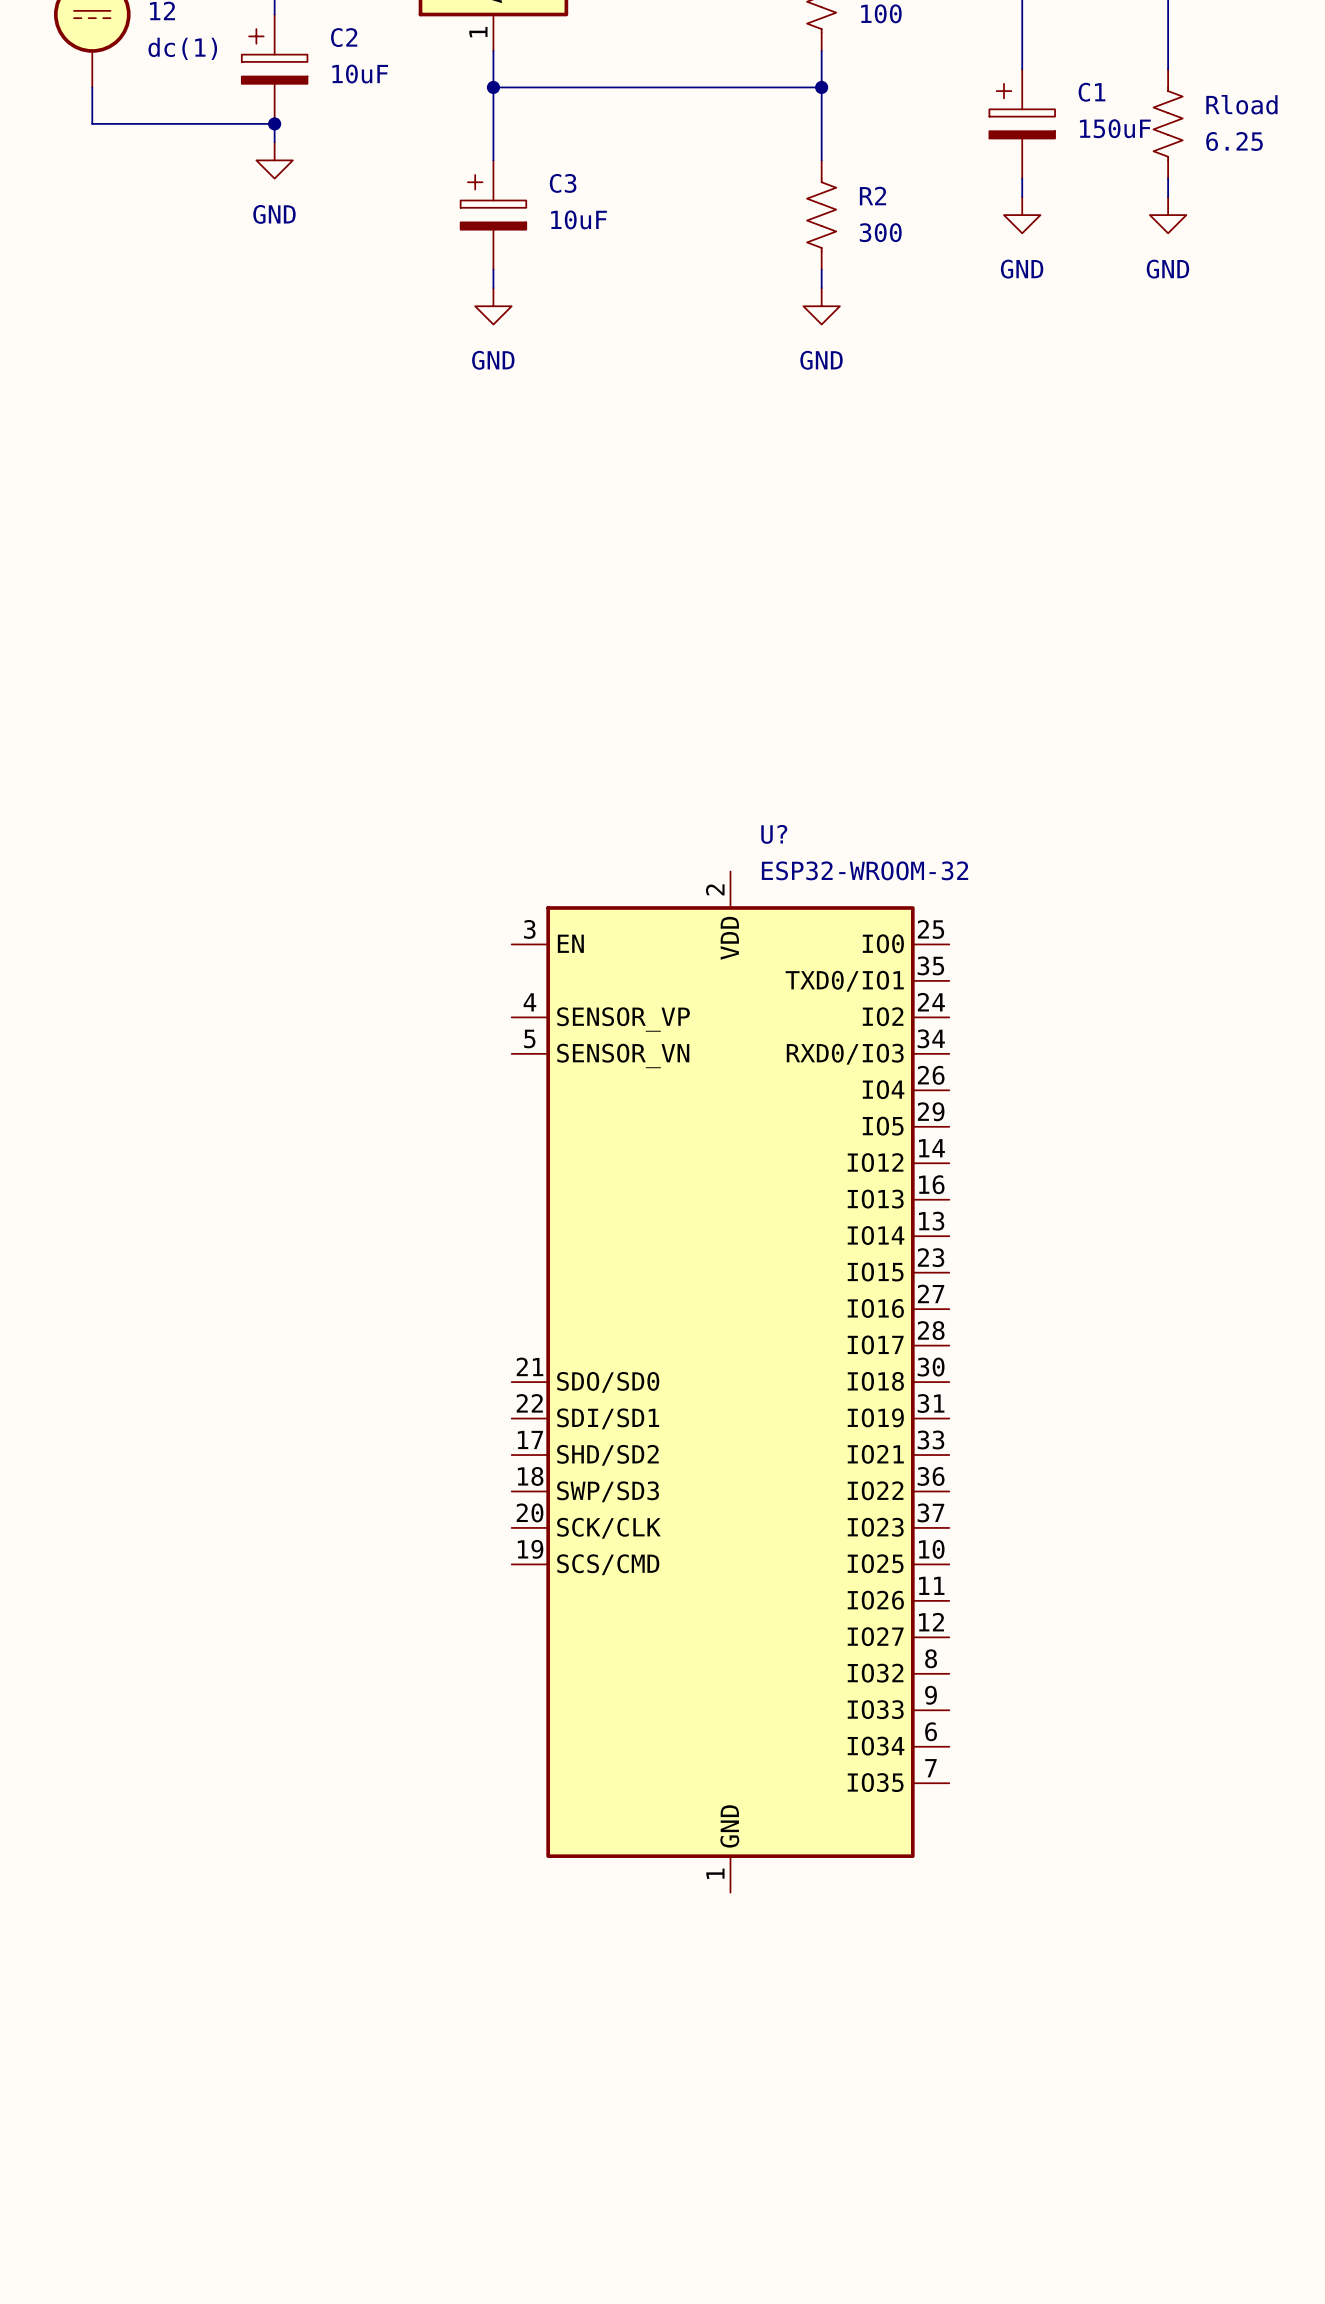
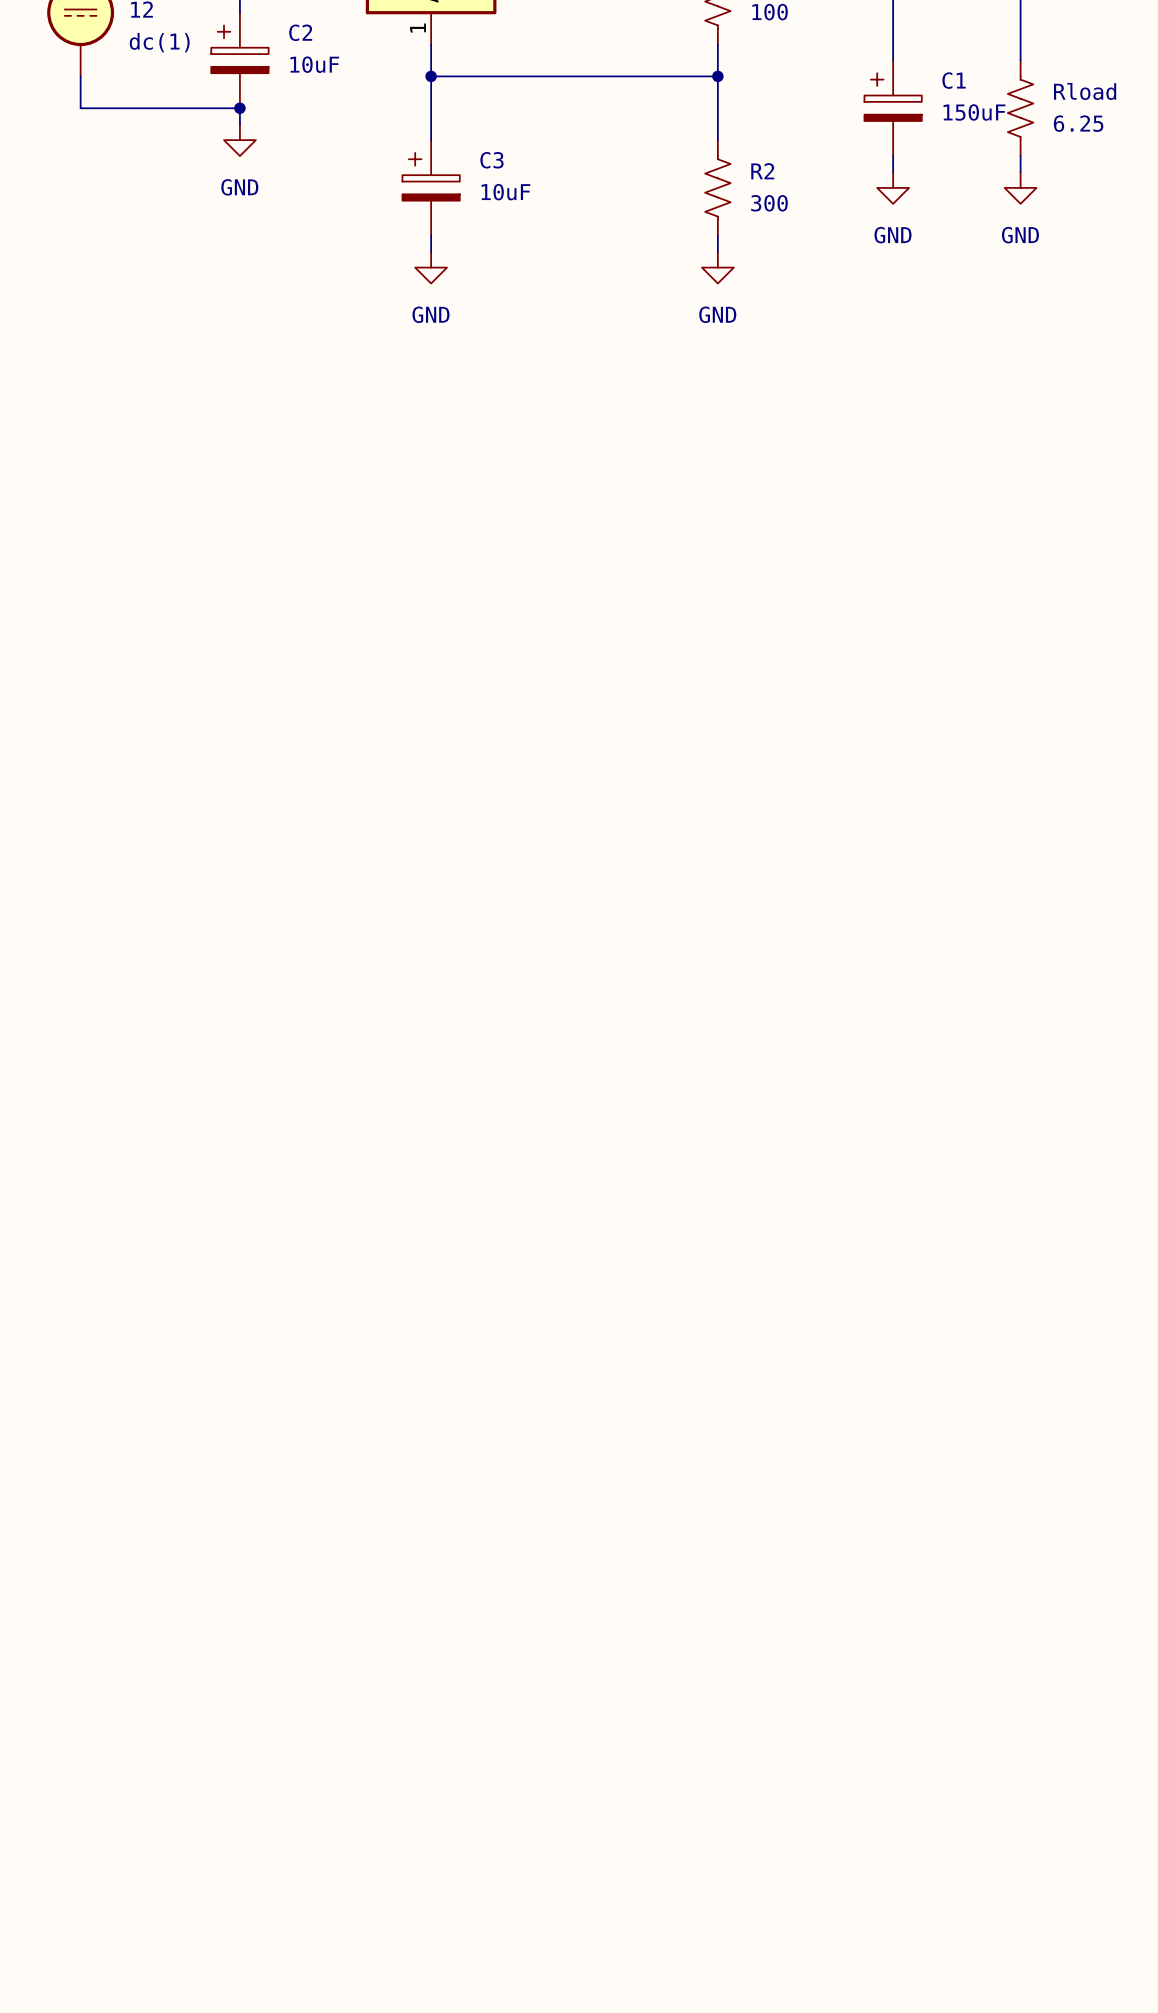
U?: ESP32-WROOM-32 (730, 1382) -> none

